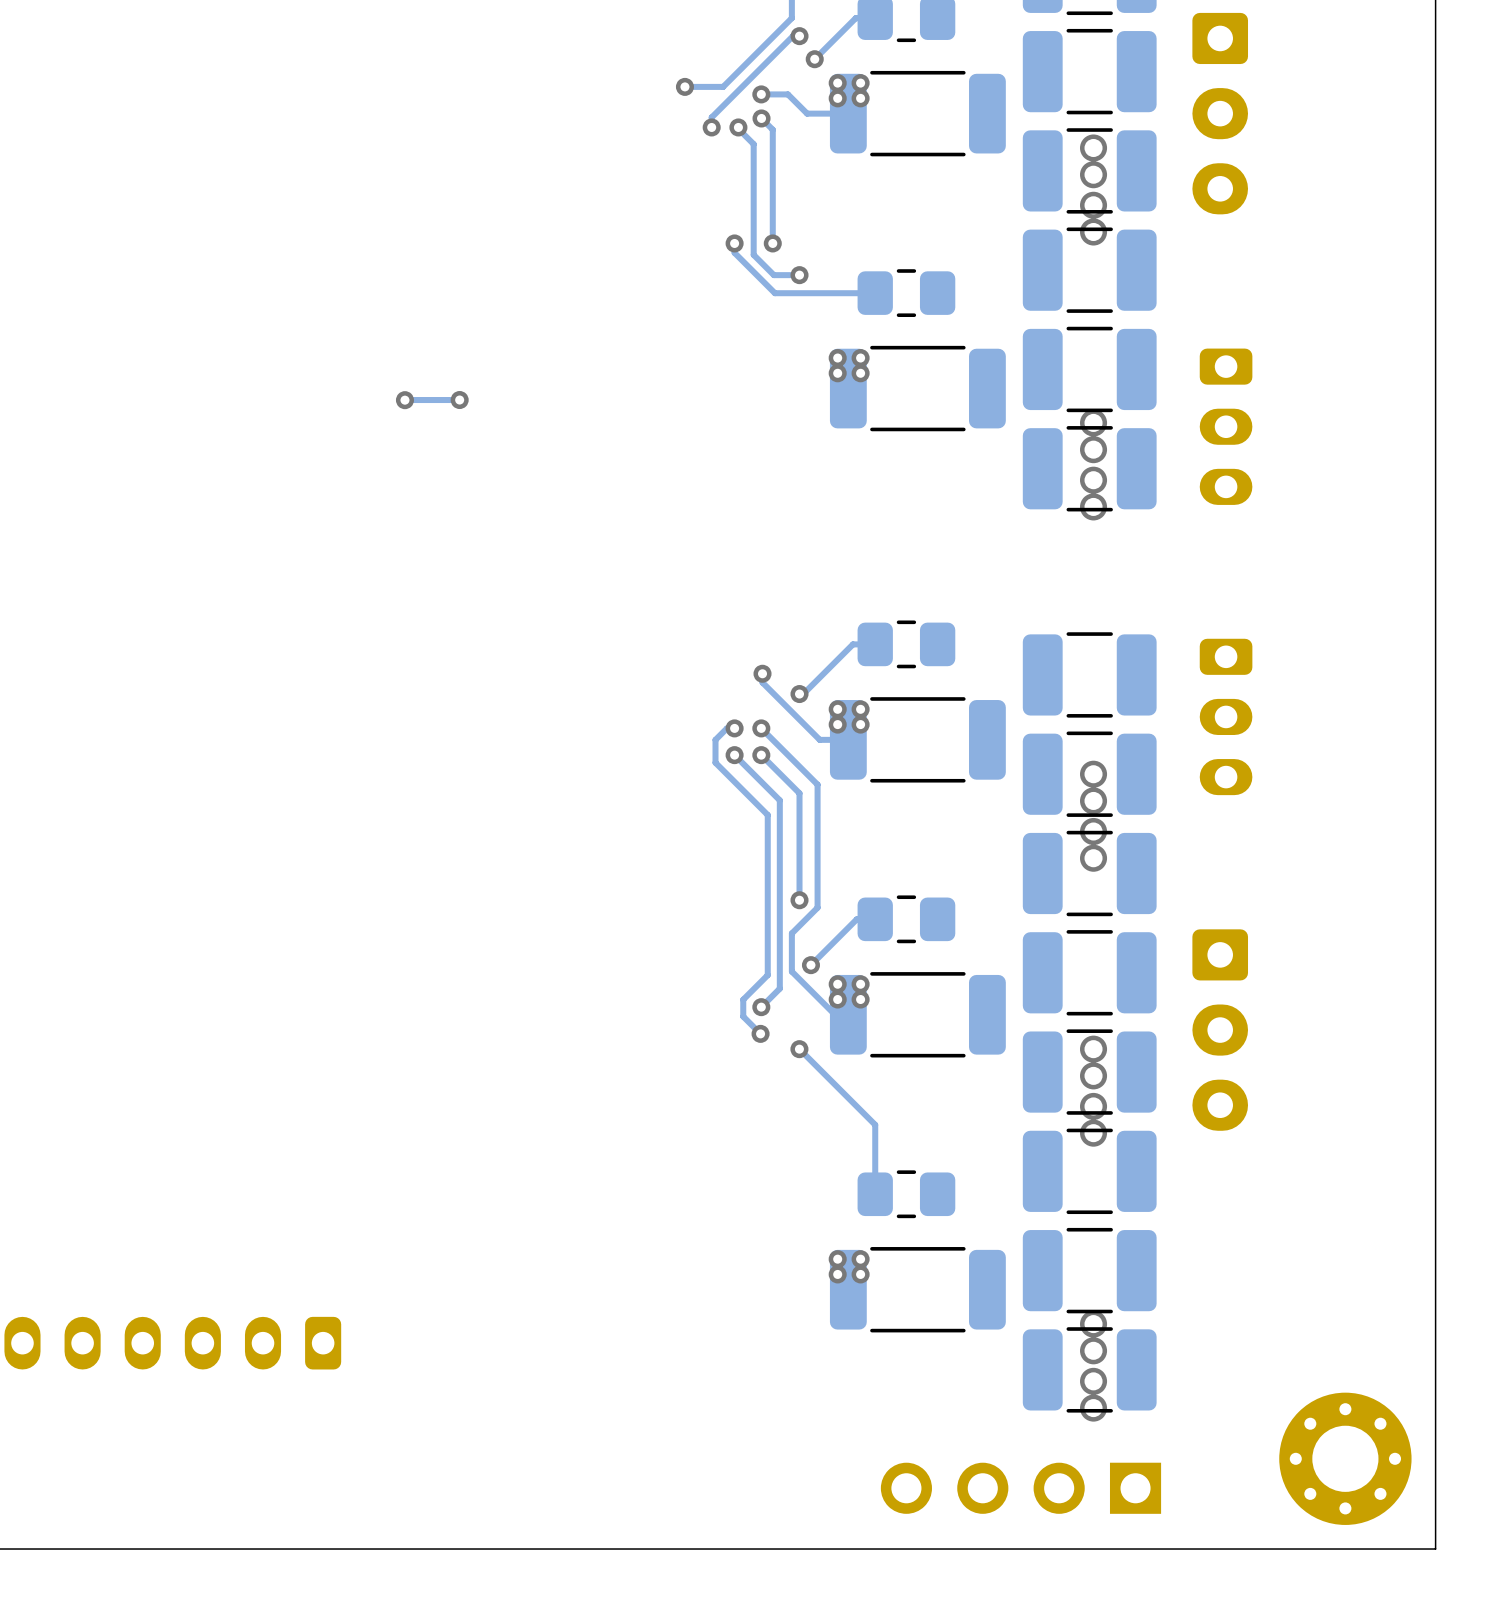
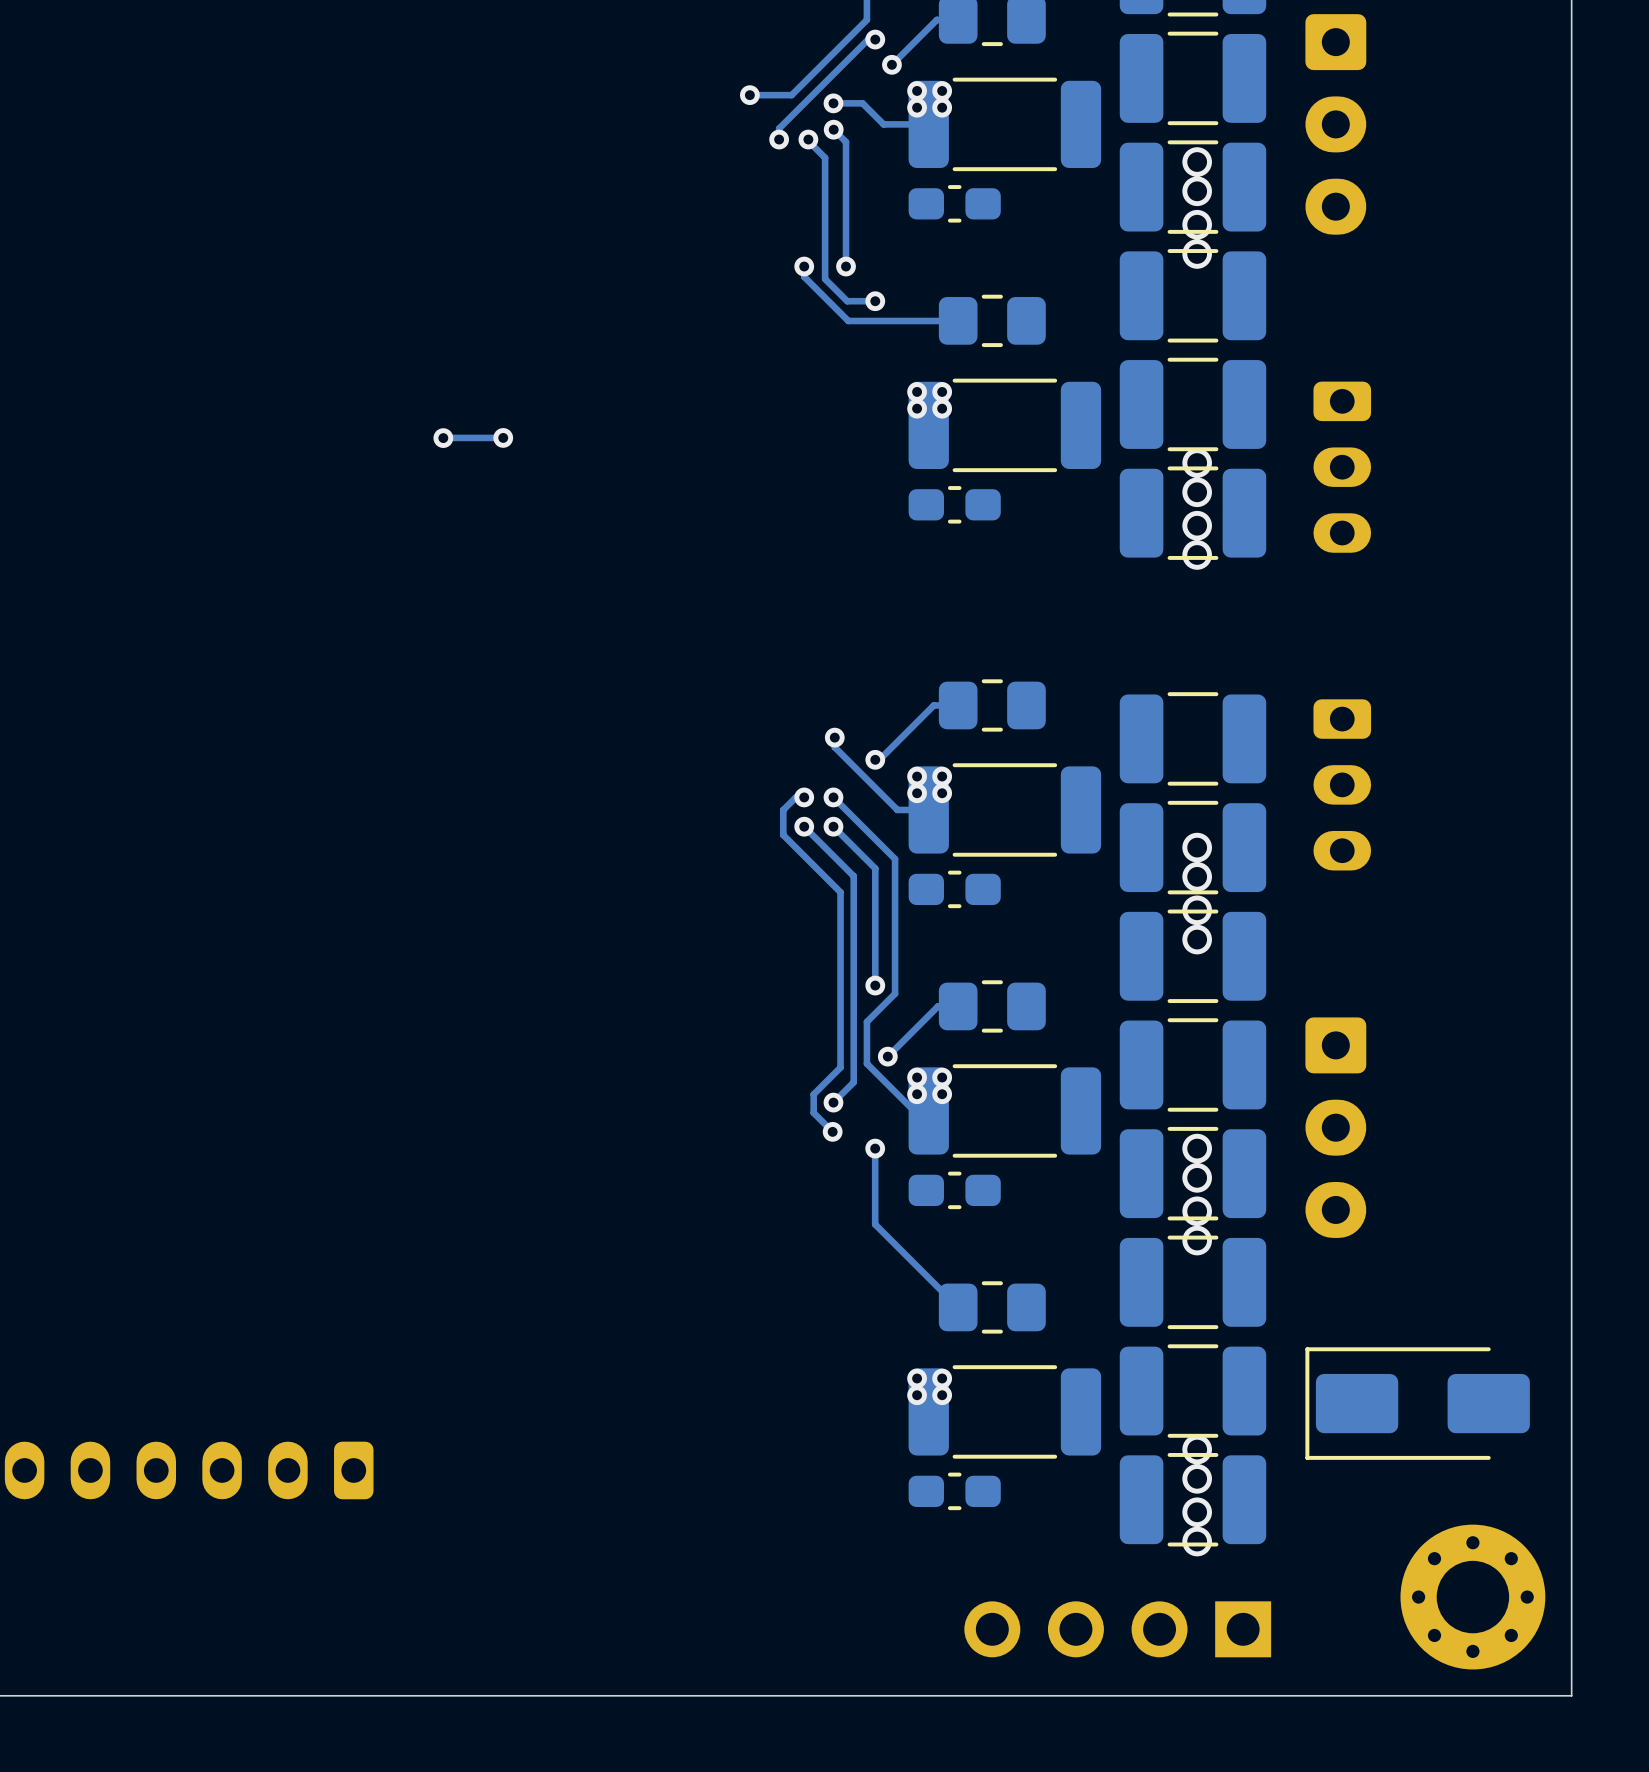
part: none -> (954, 203)
part: none -> (954, 504)
part: none -> (954, 889)
track: (799, 1049) (875, 1124) (875, 1194) -> (875, 1148) (875, 1224) (958, 1307)
part: none -> (954, 1190)
part: none -> (1417, 1403)
part: none -> (954, 1491)

